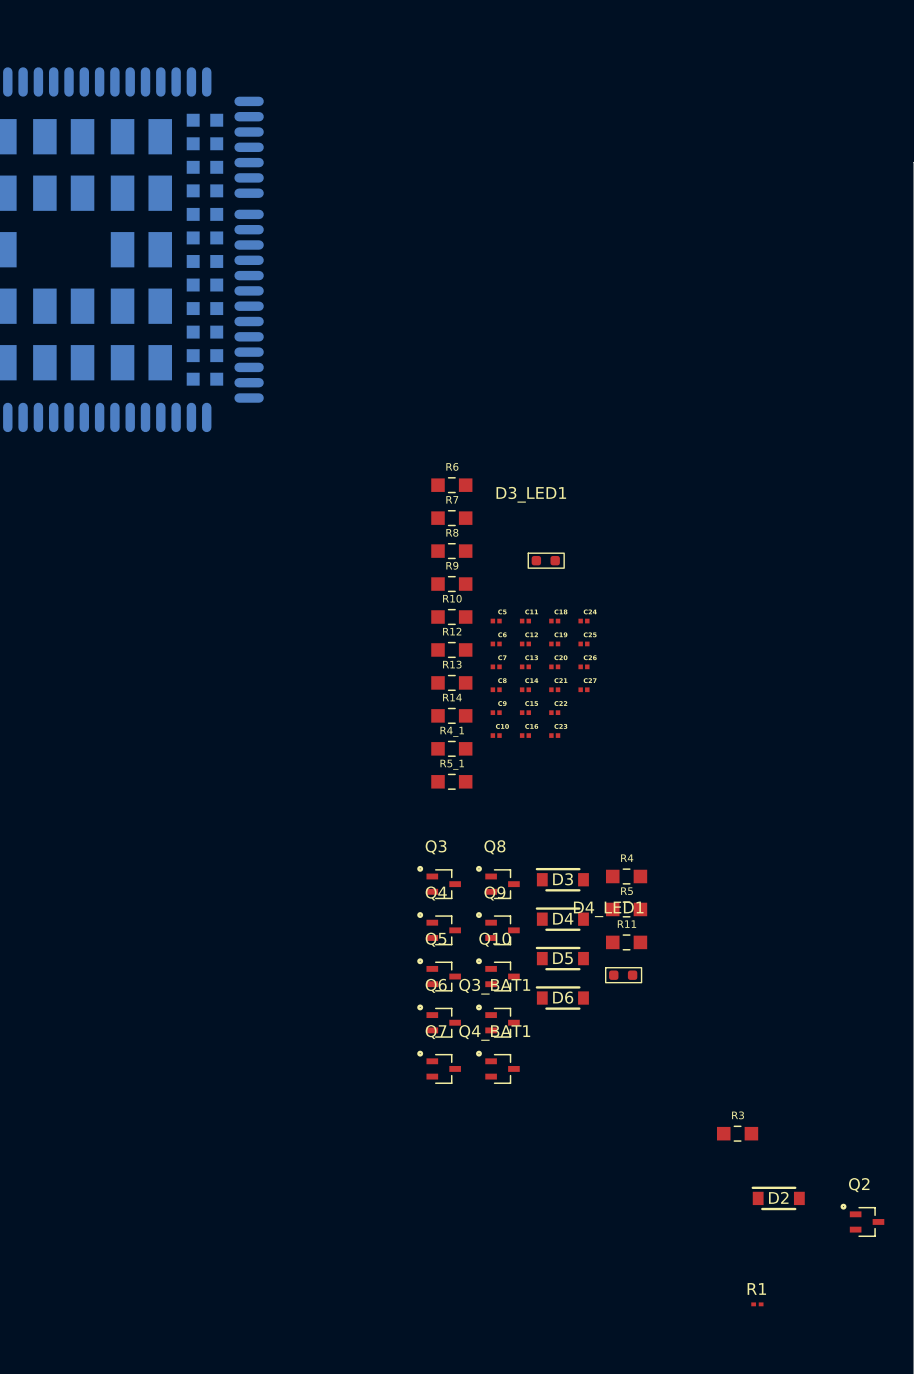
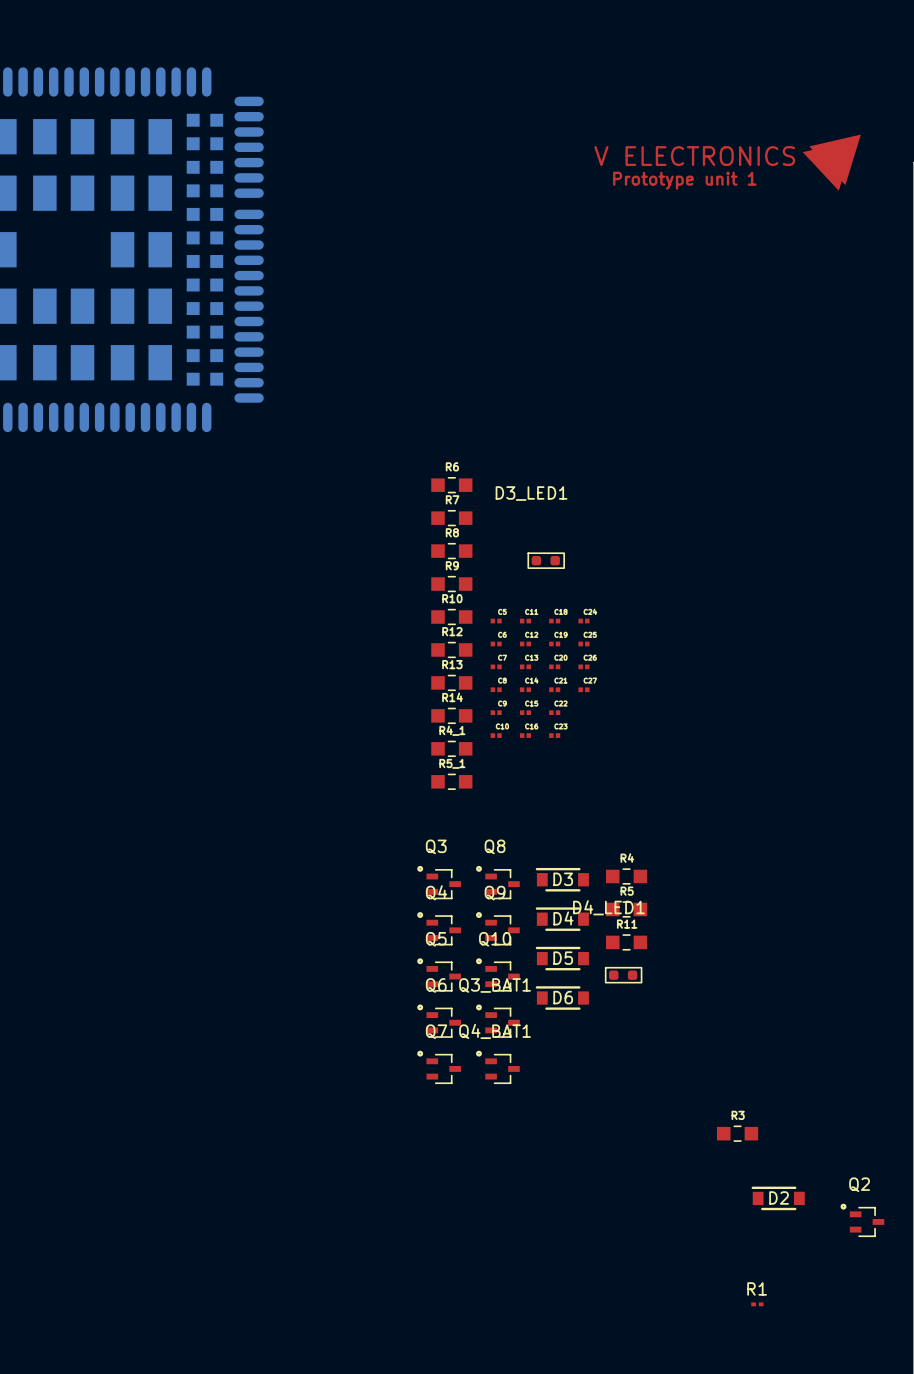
drawing: none -> [802, 134, 861, 191]
text: none -> V ELECTRONICS (694, 156)
text: none -> Prototype unit 1 (684, 180)

